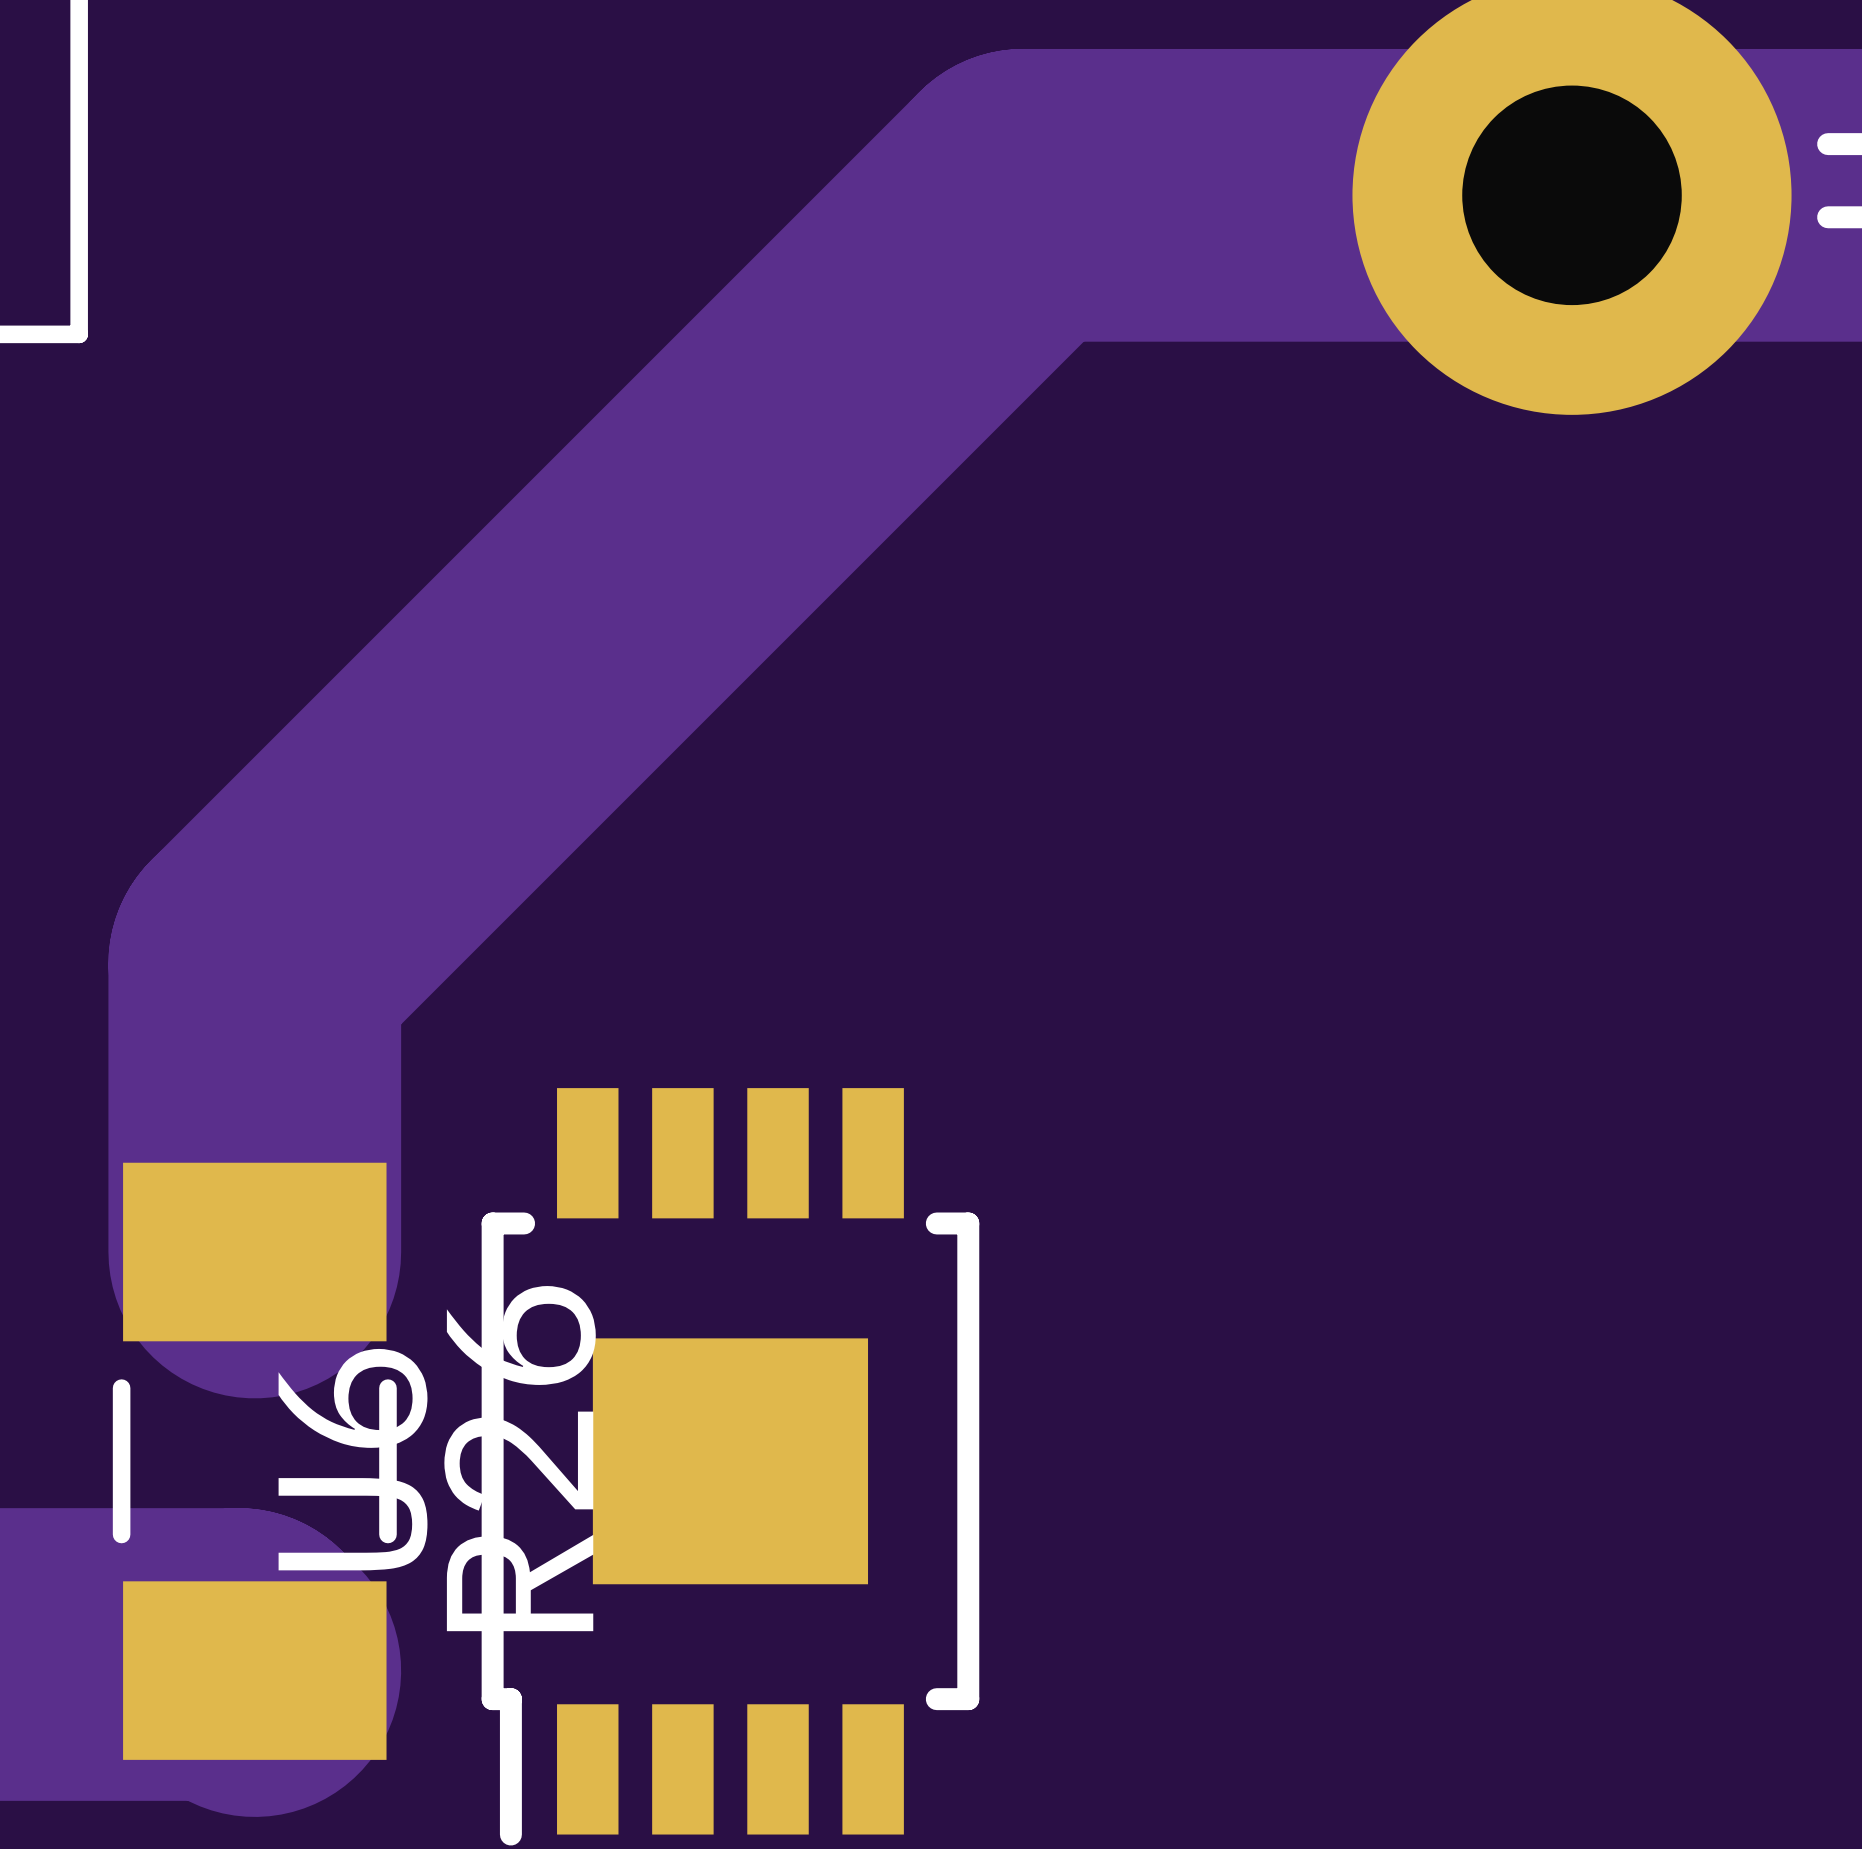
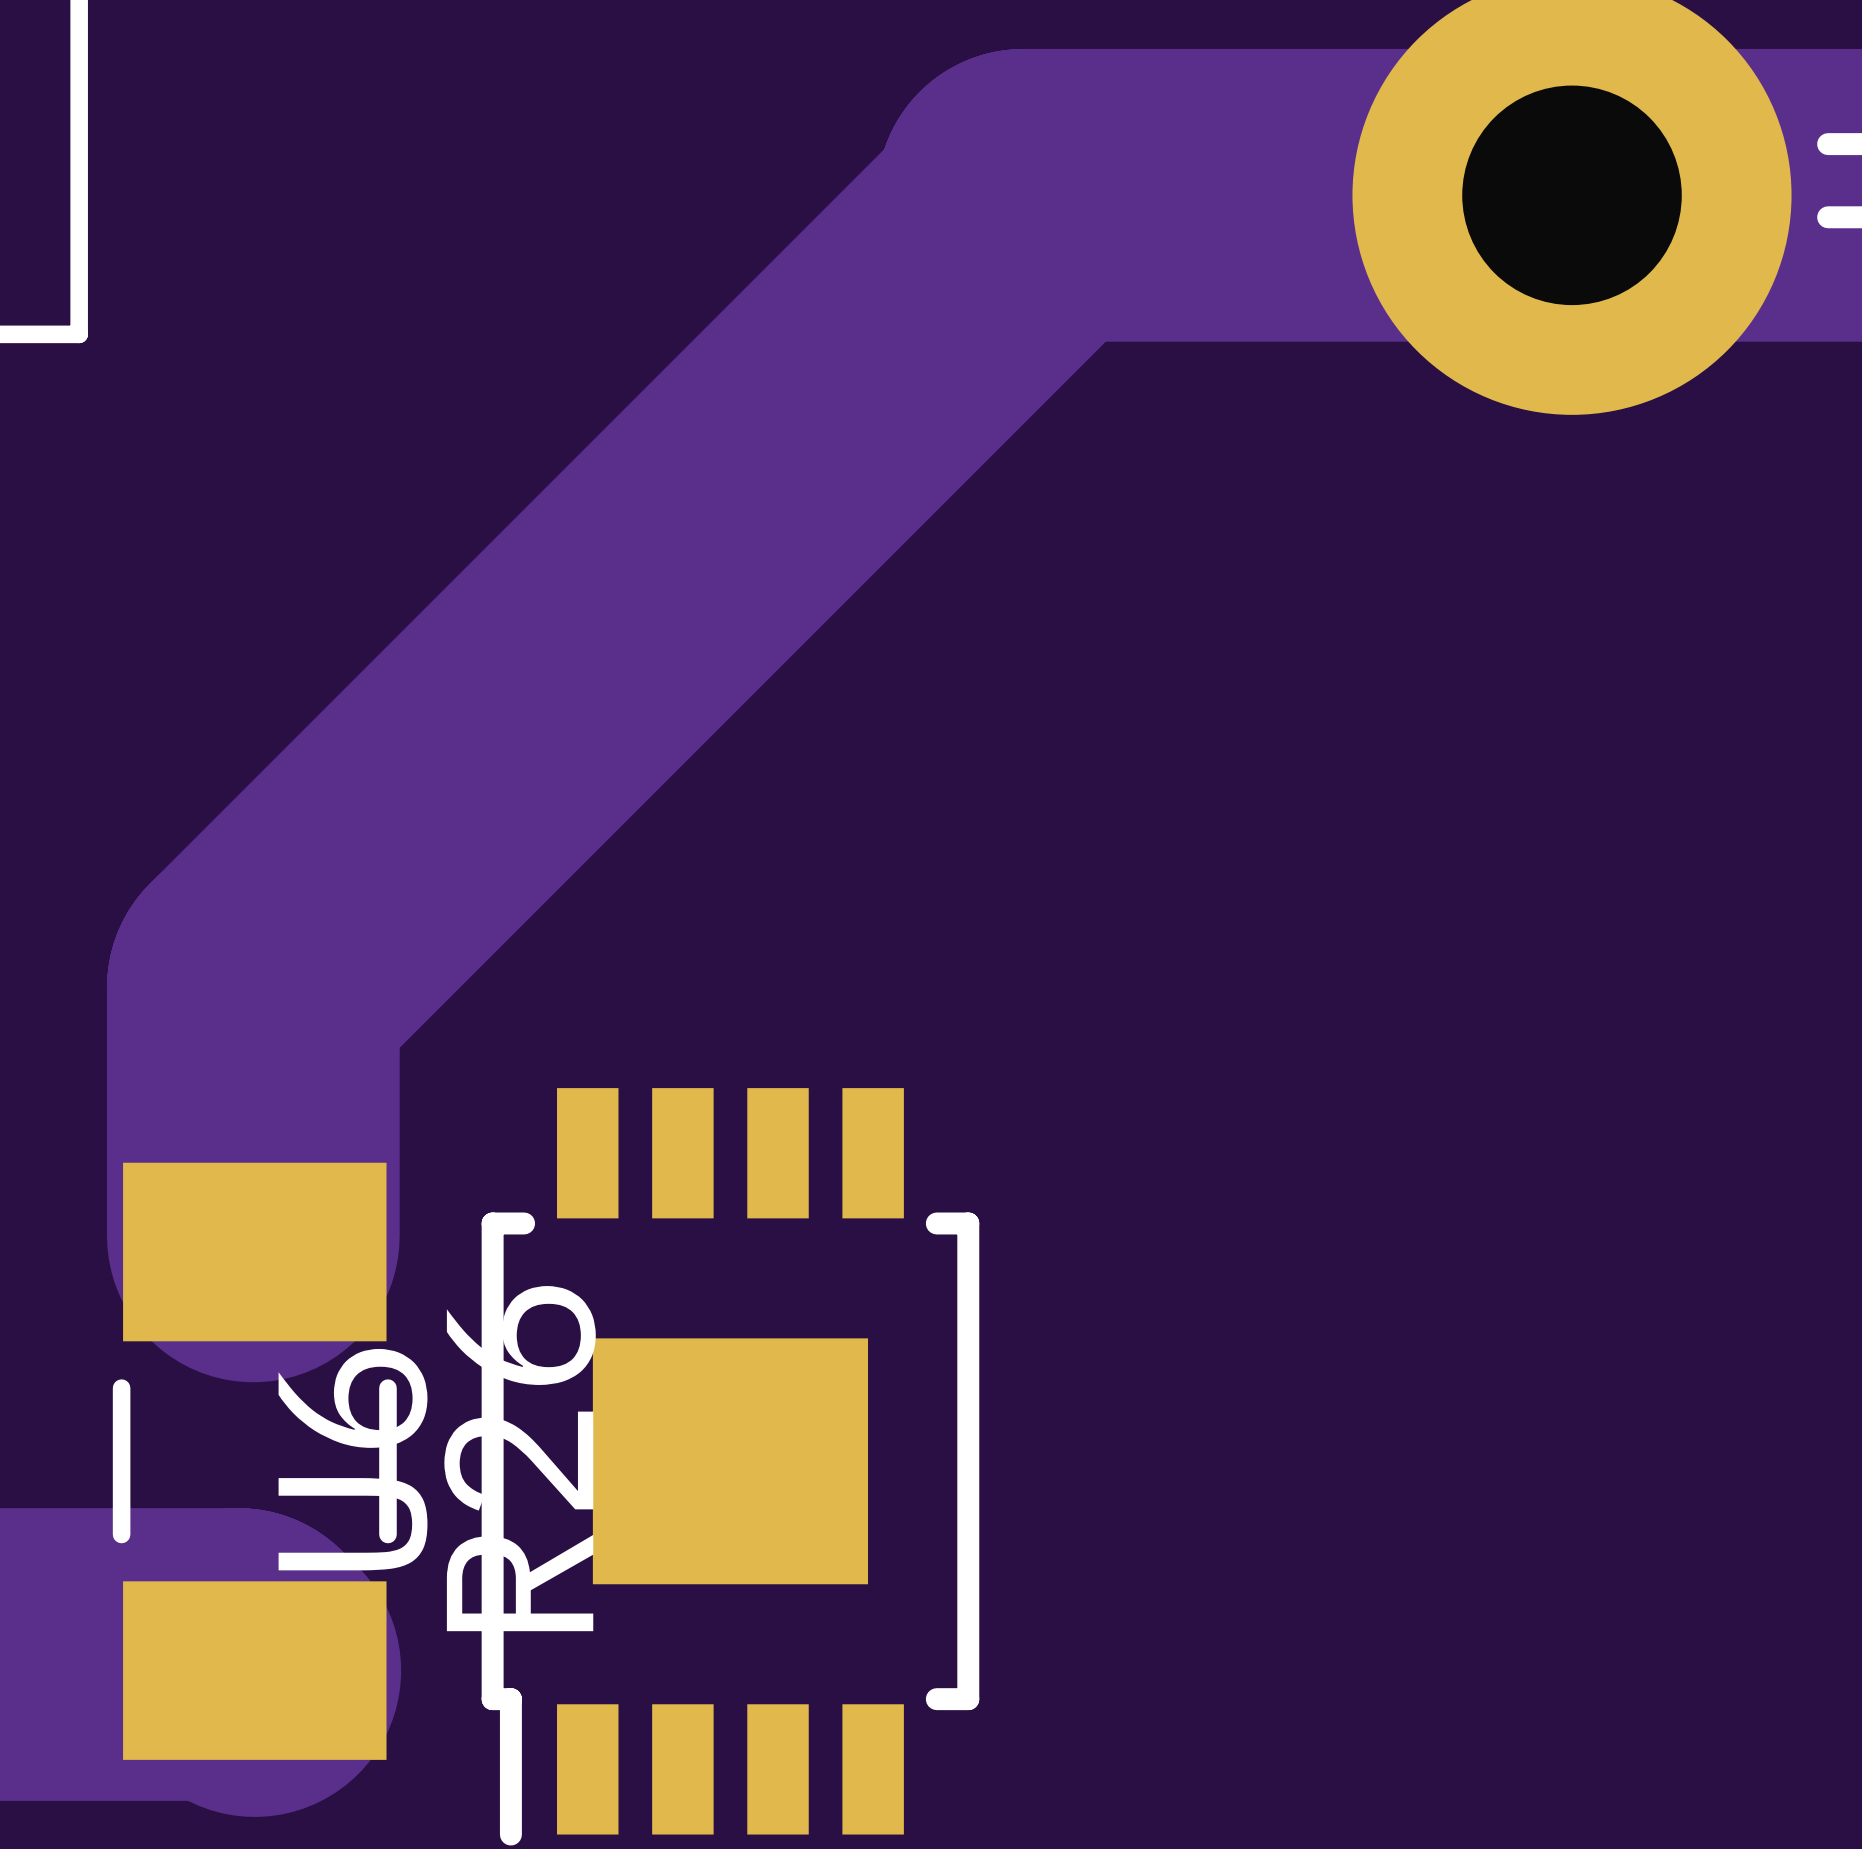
track: (1023, 195) (254, 963) (254, 1252) -> (1023, 195) (1023, 217) (253, 987) (253, 1235)

